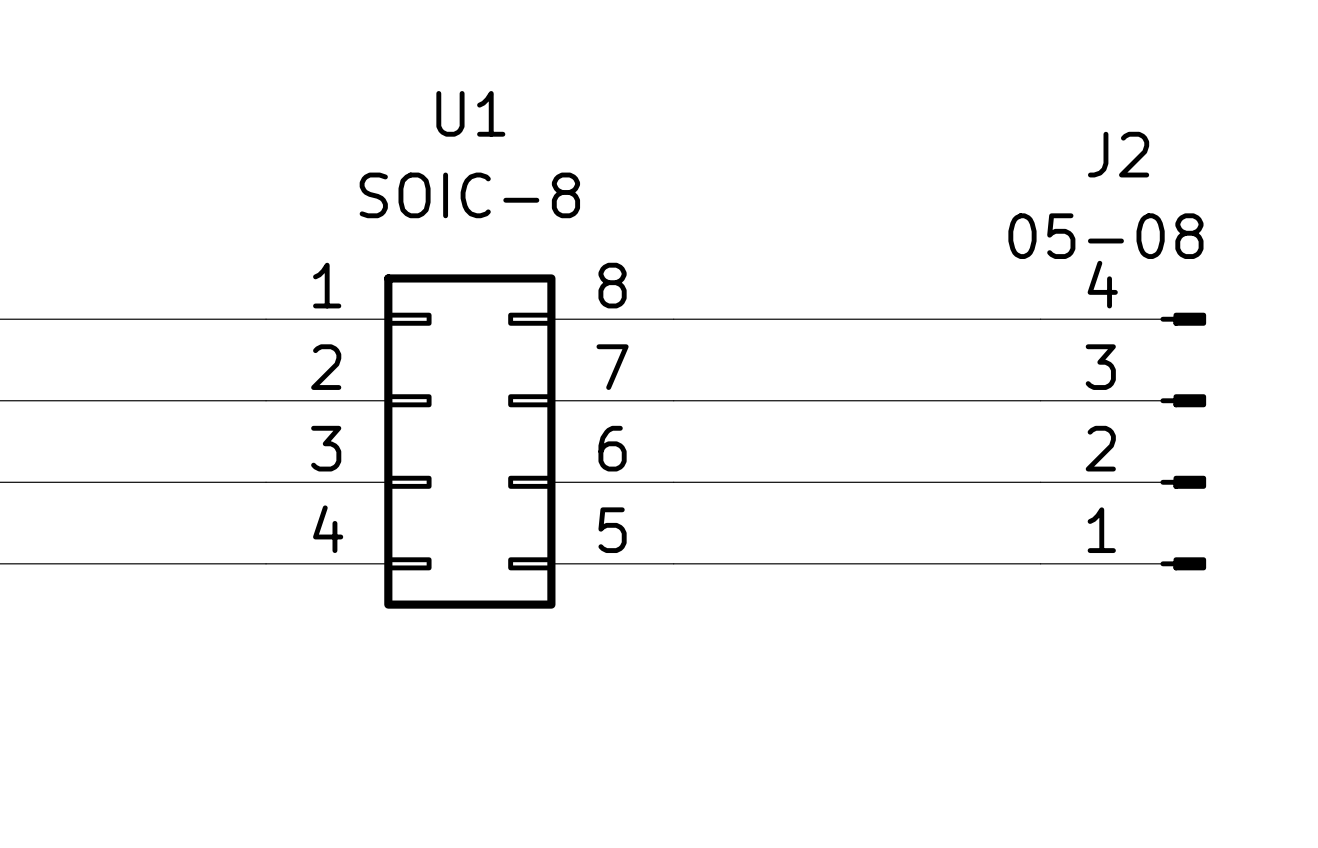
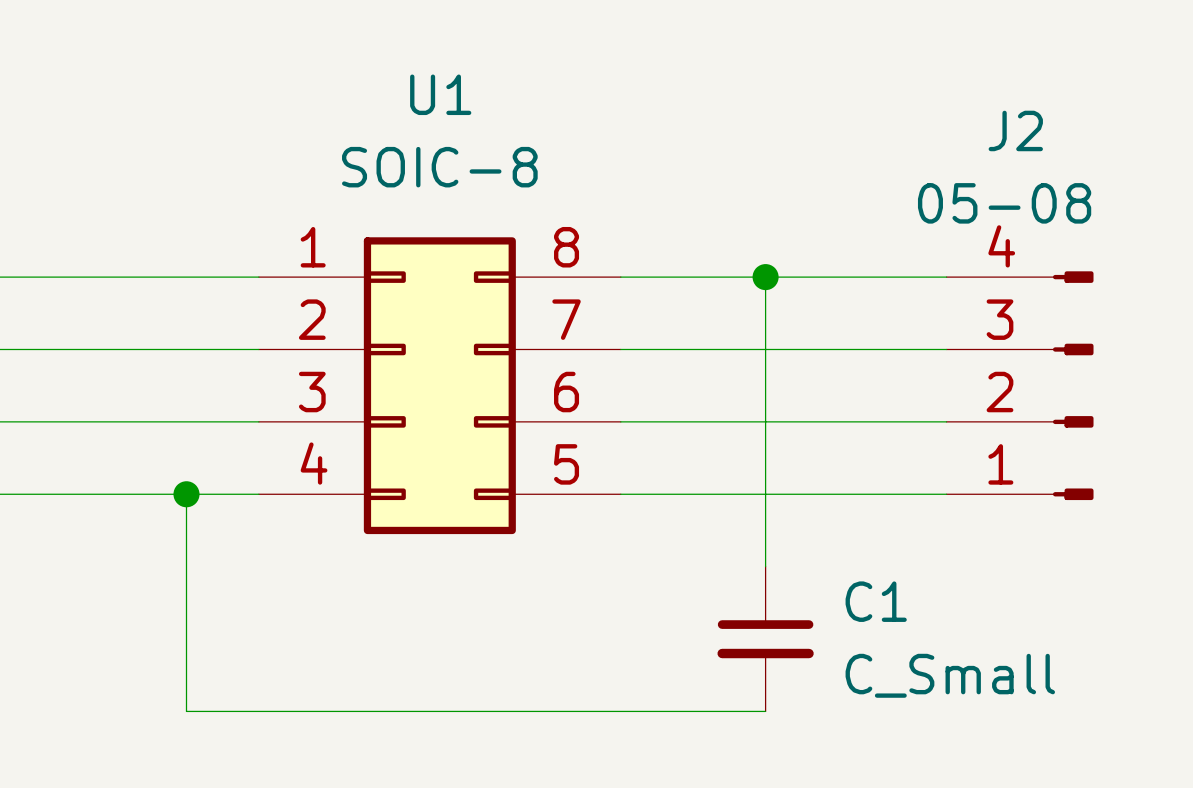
wire: none -> (765, 277) (765, 566)
junction: none -> (765, 277)
wire: none -> (186, 494) (186, 711) (765, 711)
junction: none -> (186, 494)
C1: none -> C_Small (765, 639)

